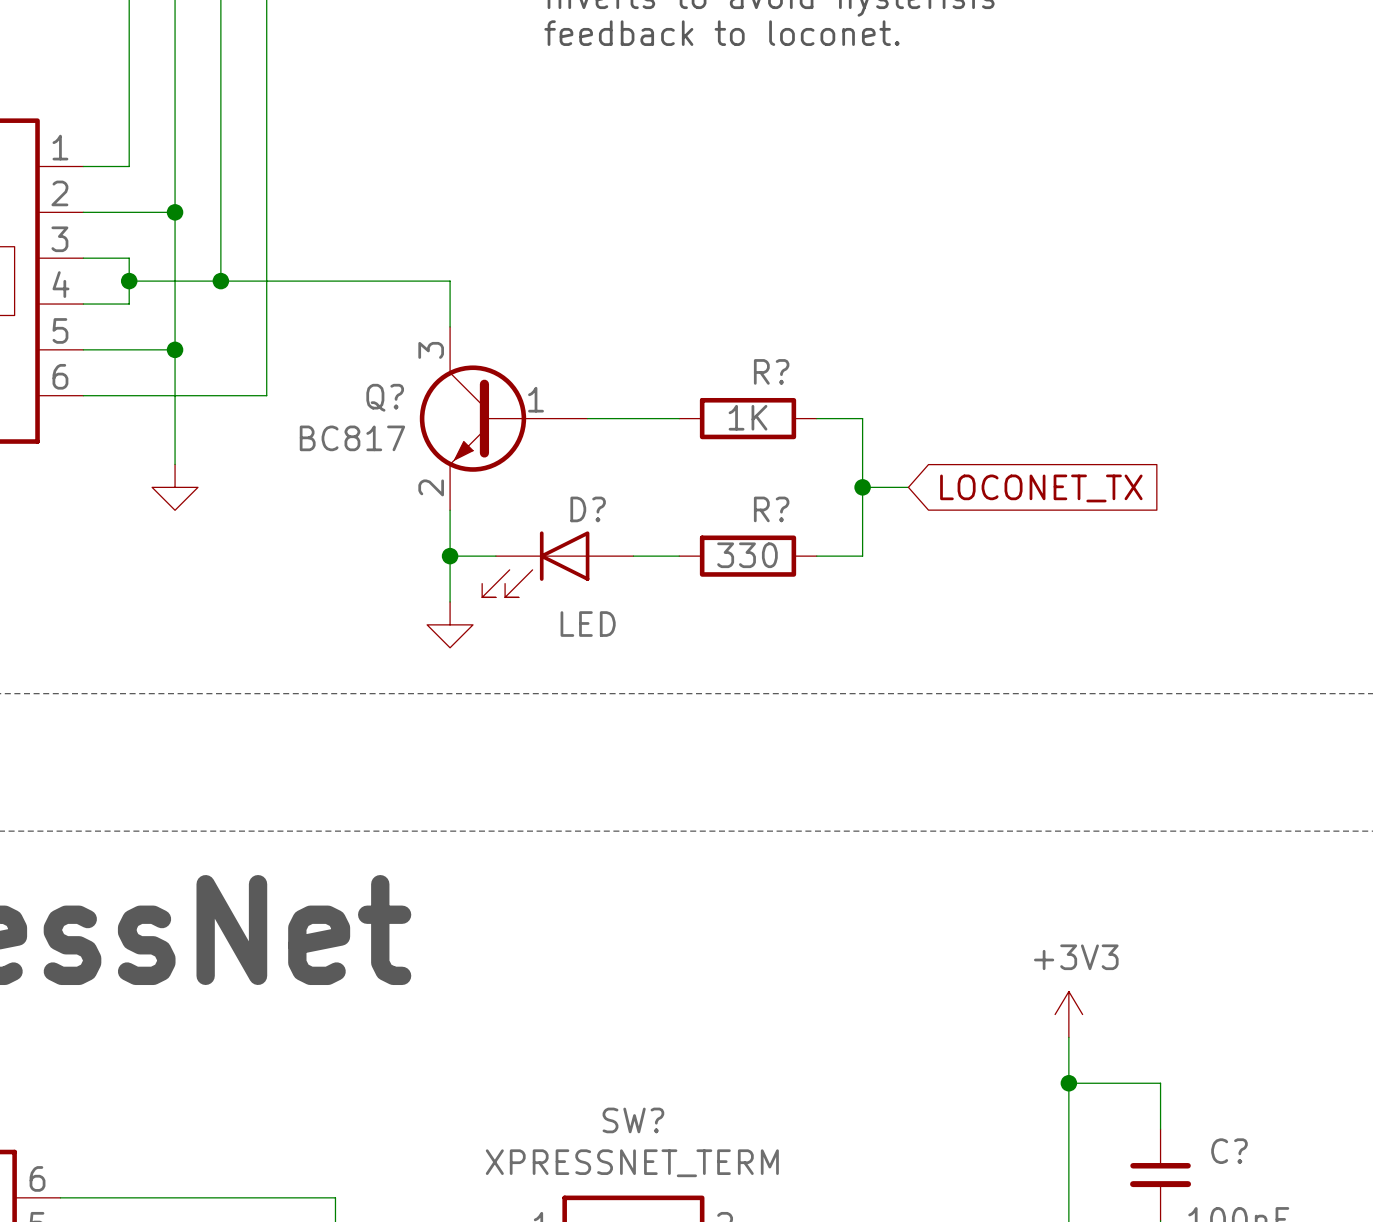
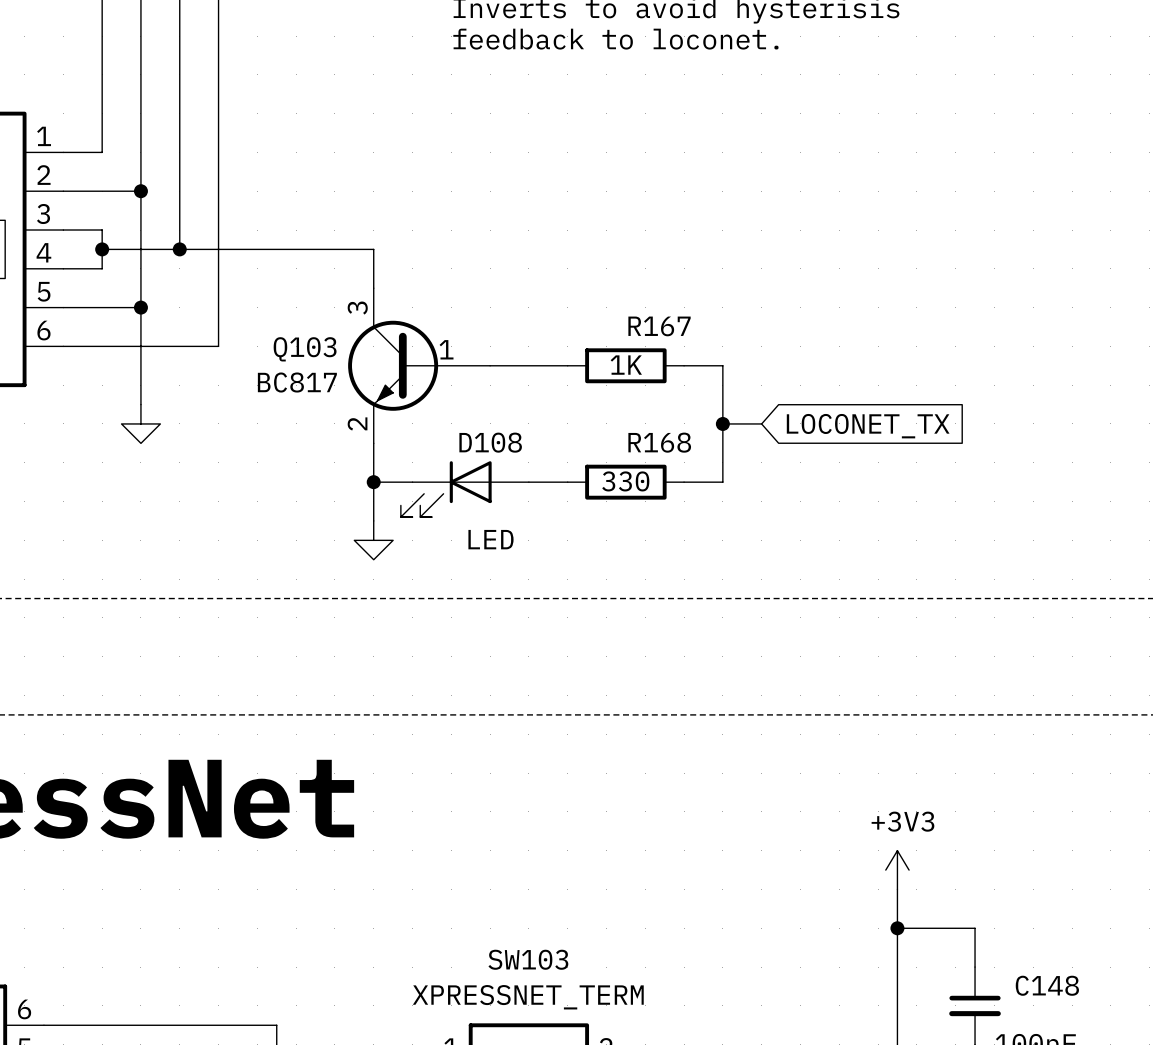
R? name: R? (771, 371) -> R167 (659, 326)
Q? name: Q? (385, 397) -> Q103 (305, 349)
D? name: D? (588, 509) -> D108 (490, 442)
R? name: R? (771, 509) -> R168 (659, 442)
SW? name: SW? (633, 1120) -> SW103 (528, 959)
C? name: C? (1229, 1151) -> C148 (1047, 985)

